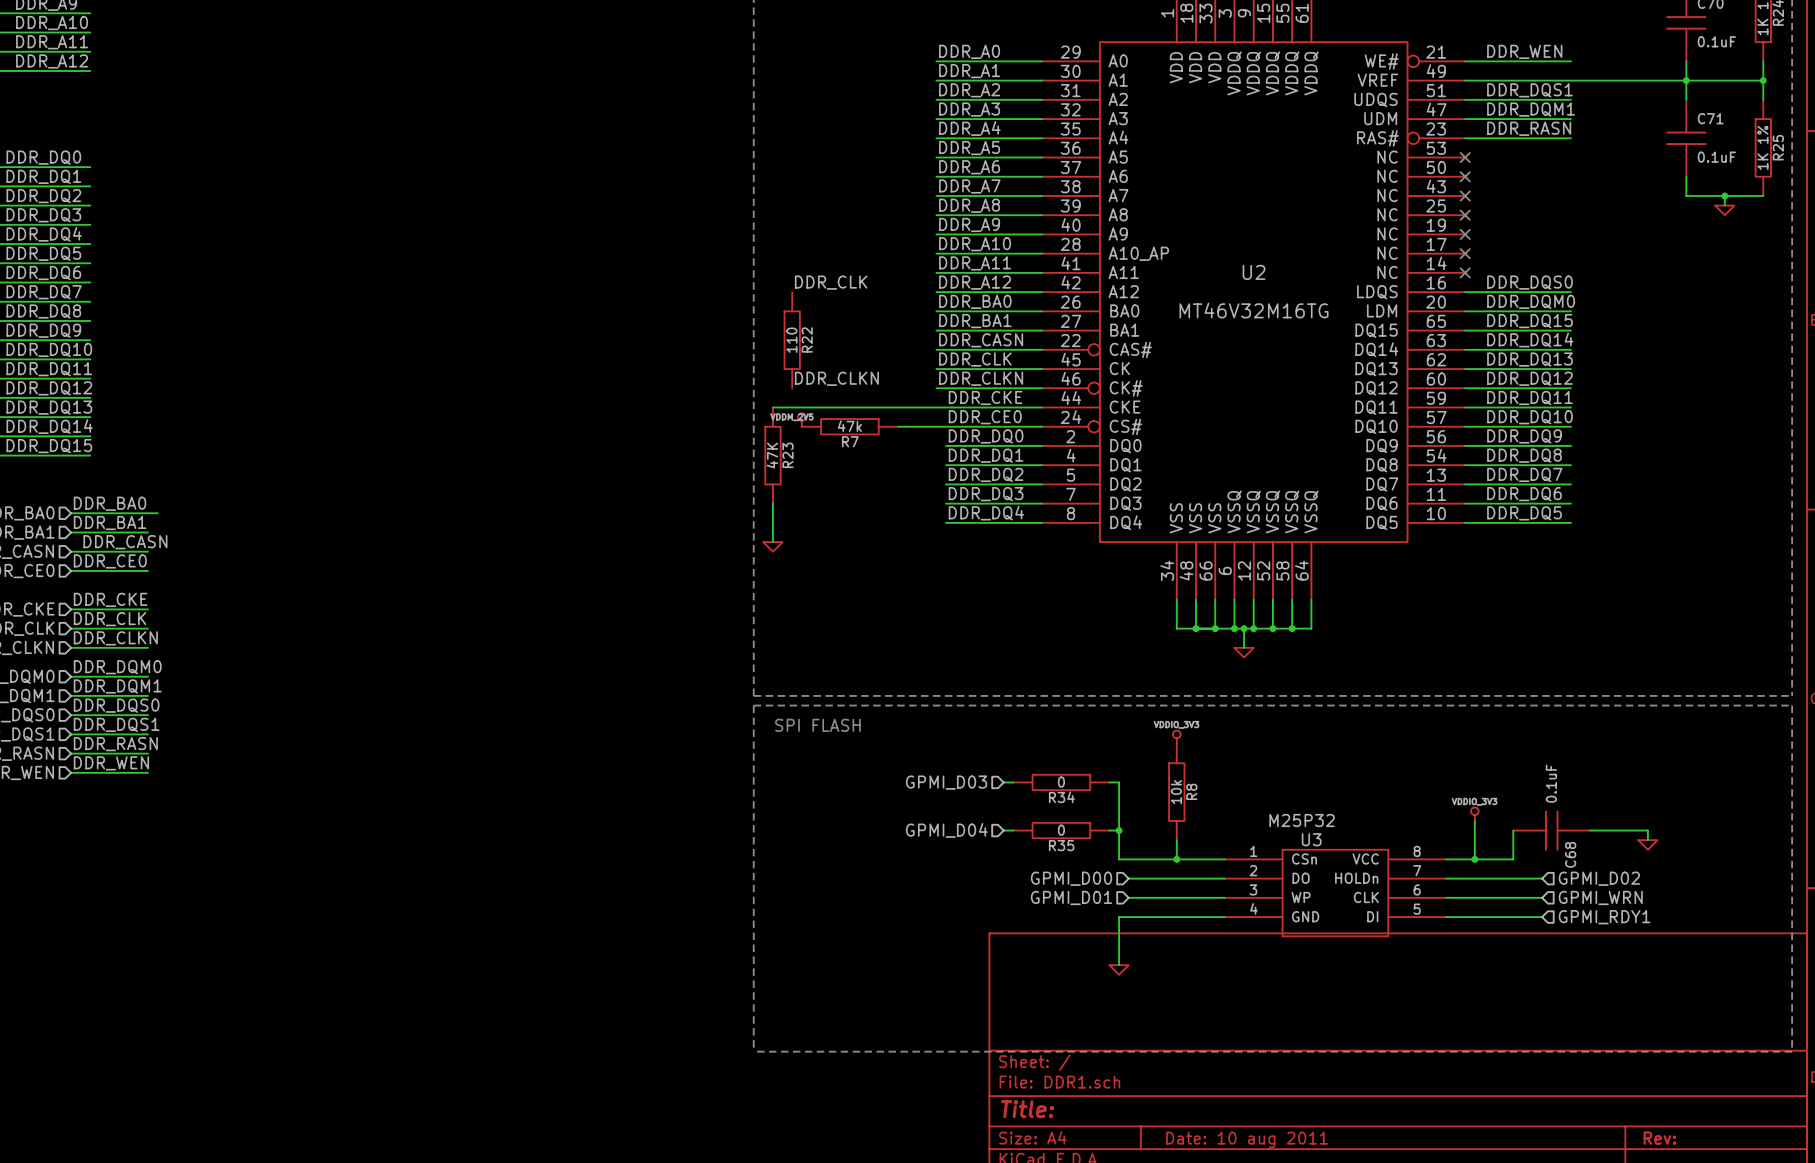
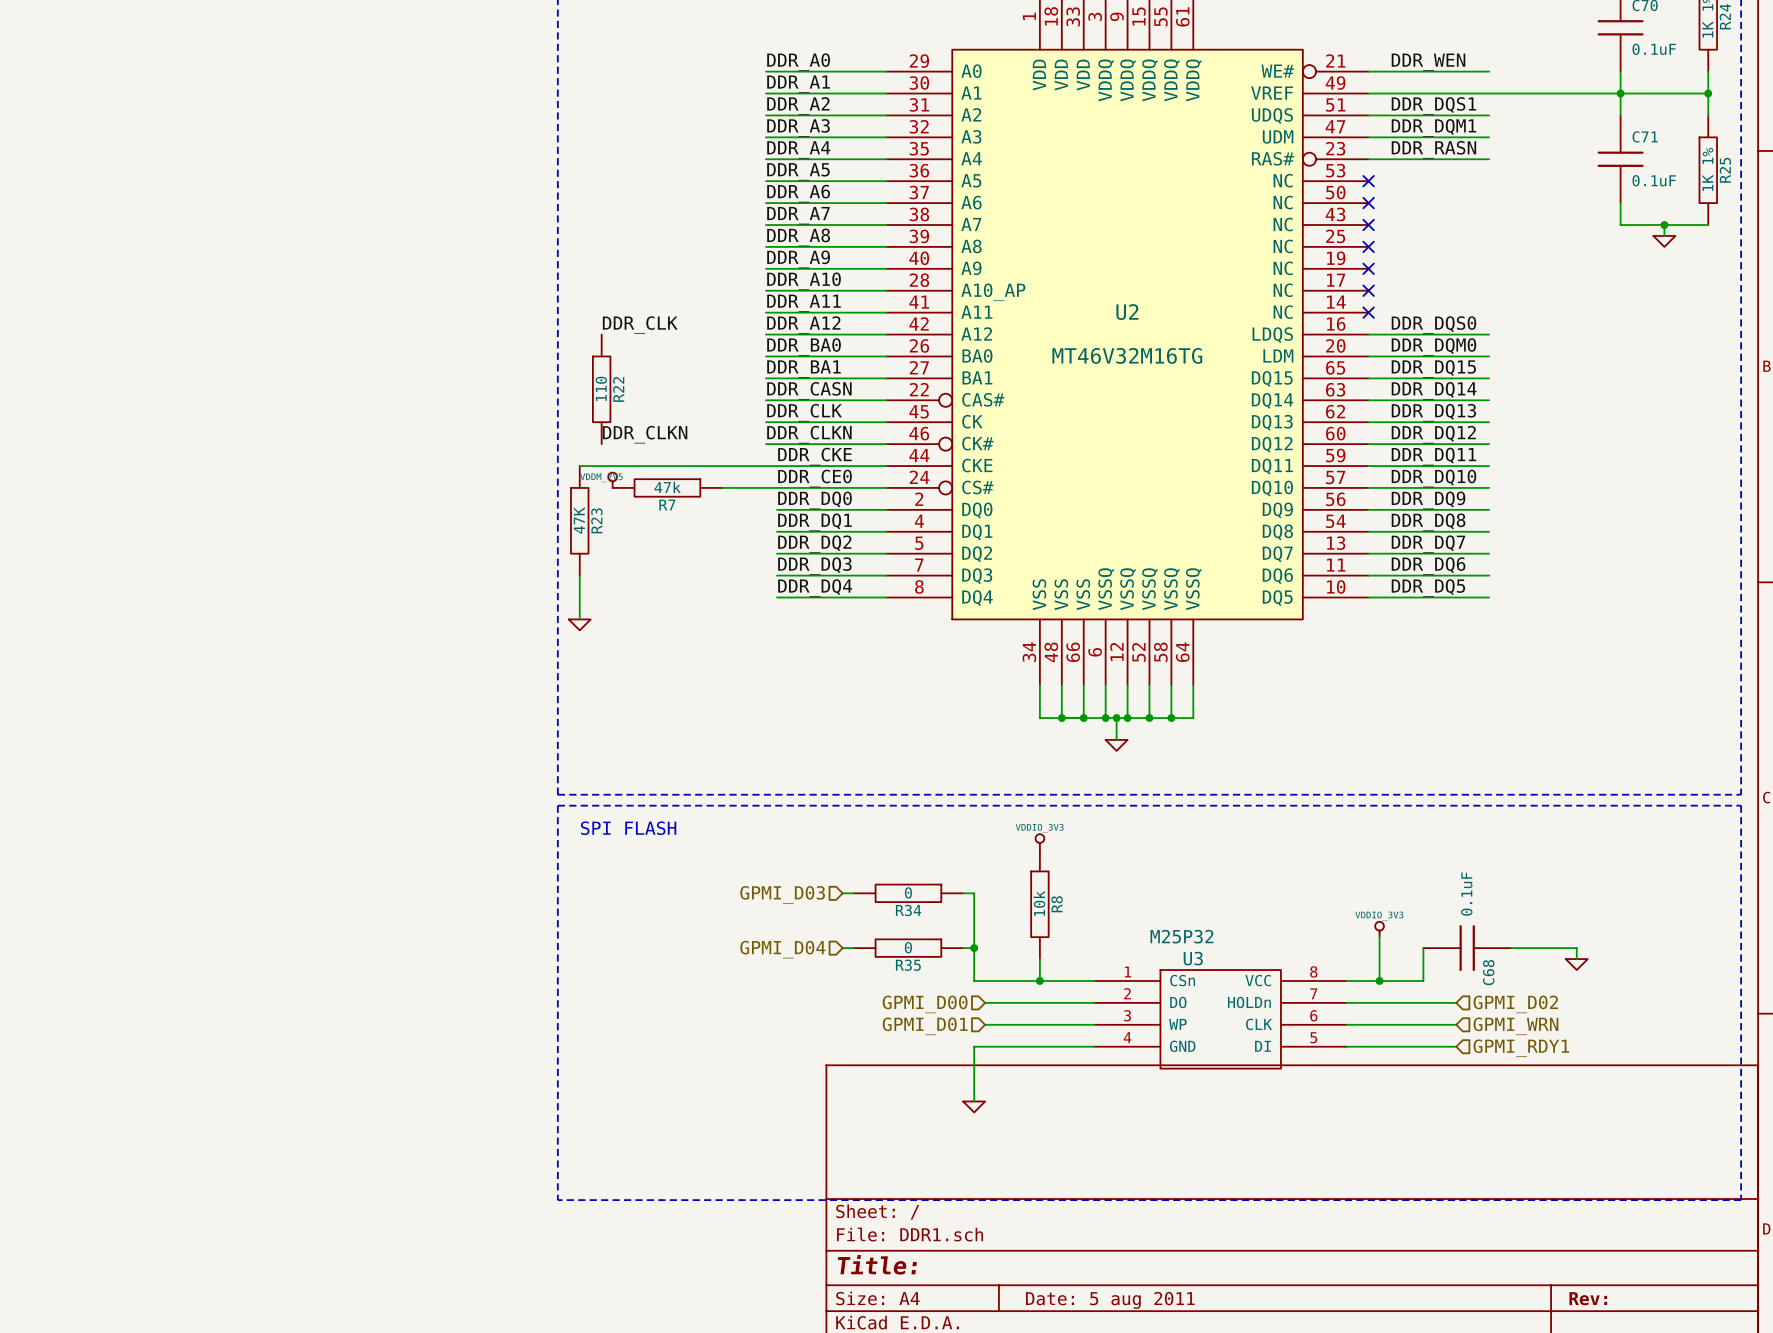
title block: Date: 10 aug 2011 (1247, 1139) -> Date: 5 aug 2011 (1110, 1300)

